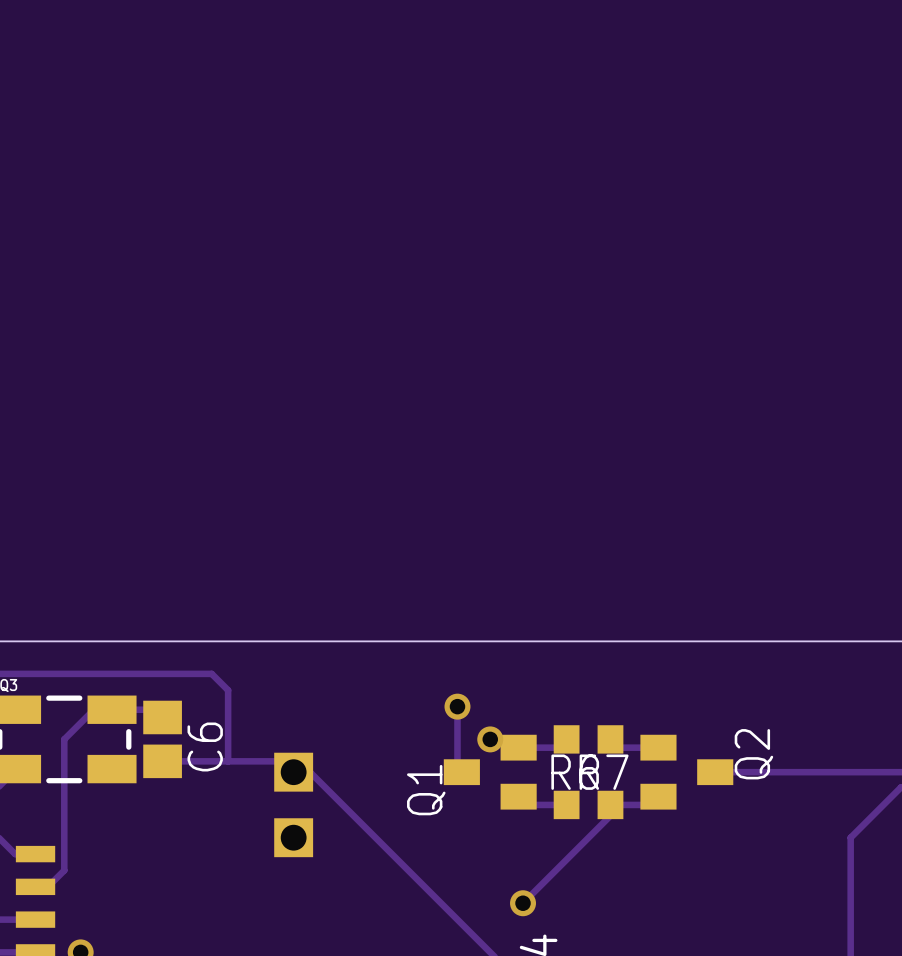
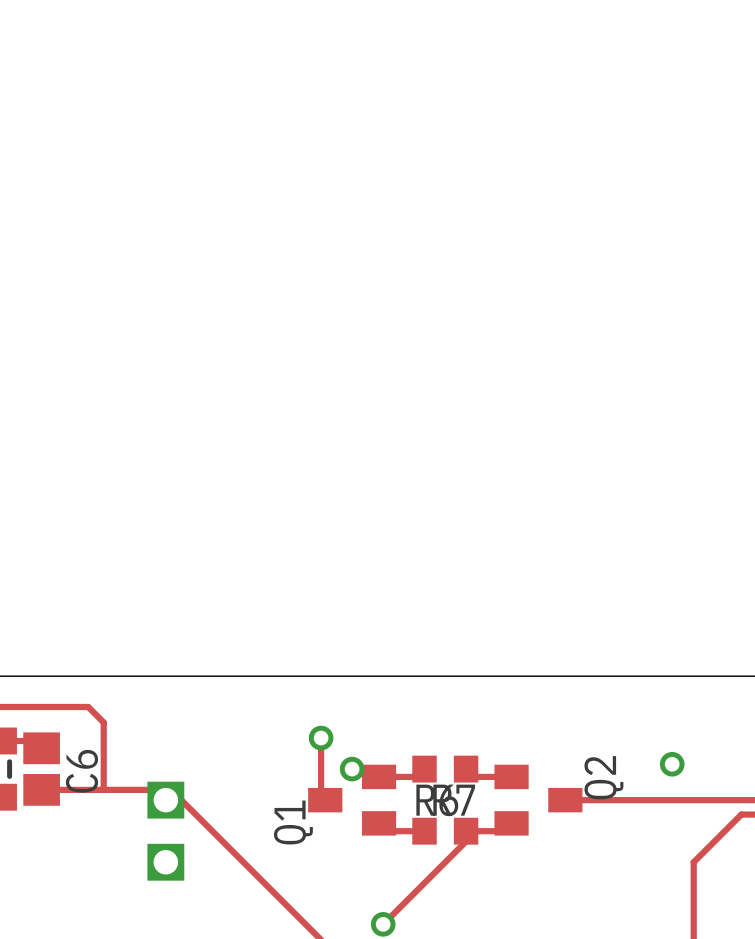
via: none -> (672, 764)

